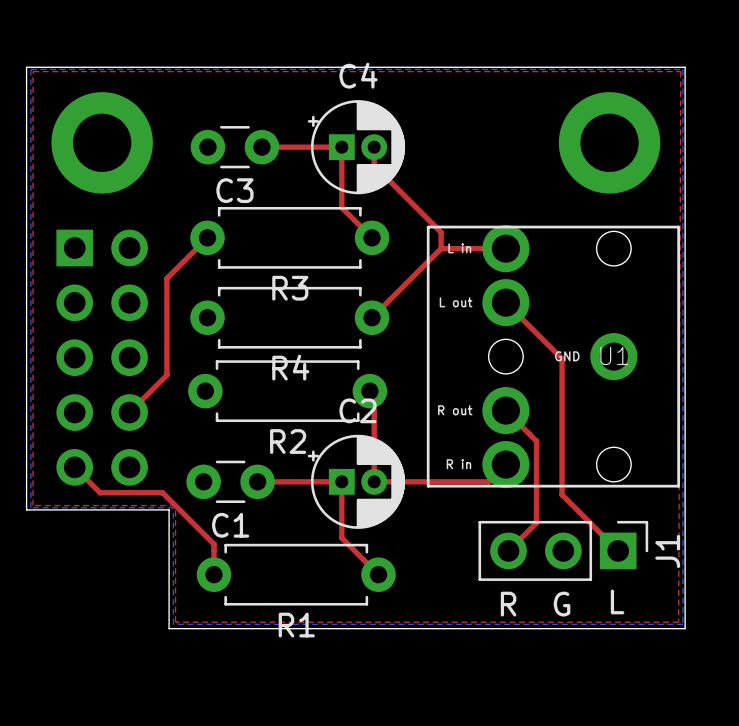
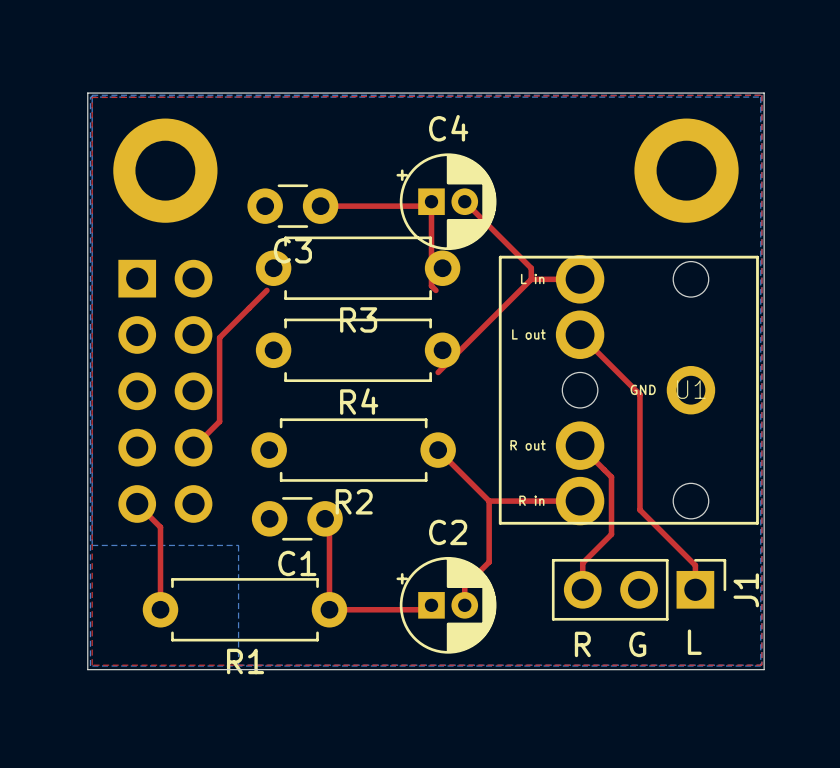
bottom zone outline: none -> (90, 97) (90, 666) (760, 666) (760, 97) (90, 97)
top zone outline: (33, 71) (33, 505) (175, 505) (175, 622) (678, 622) (680, 71) (33, 71) -> (761, 95) (92, 97) (92, 665) (761, 665) (761, 95)
C3 position: (234, 147) -> (292, 206)
top track: (261, 147) (341, 147) (341, 207) (372, 237) -> none
C4 position: (356, 147) -> (446, 201)
top track: (374, 147) (374, 165) (441, 232) (441, 248) -> none
top track: none -> (464, 201) (531, 268) (531, 279) (438, 372)
top track: none -> (320, 206) (427, 206) (431, 201) (431, 285) (435, 290)
top track: (207, 237) (166, 278) (166, 375) (154, 387) -> (266, 290) (219, 337) (219, 421)
top track: (441, 248) (458, 248) -> none
top track: (441, 248) (372, 317) -> none
top track: (562, 358) (562, 494) (618, 550) -> (637, 392) (639, 394) (639, 509) (695, 565) (695, 589)
R2 position: (287, 391) -> (353, 450)
top track: (369, 391) (374, 395) (374, 481) (488, 481) (505, 464) -> (489, 501) (580, 501)
top track: none -> (438, 450) (489, 501)
top track: none -> (489, 501) (489, 562) (464, 586) (464, 605)
top track: (257, 481) (341, 481) (341, 537) (378, 574) -> none
C2 position: (356, 481) -> (446, 605)
top track: none -> (325, 521) (329, 525) (329, 609) (427, 609) (431, 605)
top track: (97, 490) (100, 492) (162, 492) (213, 544) (213, 574) -> (160, 527) (160, 609)
top track: (536, 496) (536, 522) (508, 550) -> (611, 534) (582, 563) (582, 589)
board edge: (26, 509) (169, 509) (169, 628) -> (87, 547) (87, 669) (234, 669)
R1 position: (296, 574) -> (244, 609)

